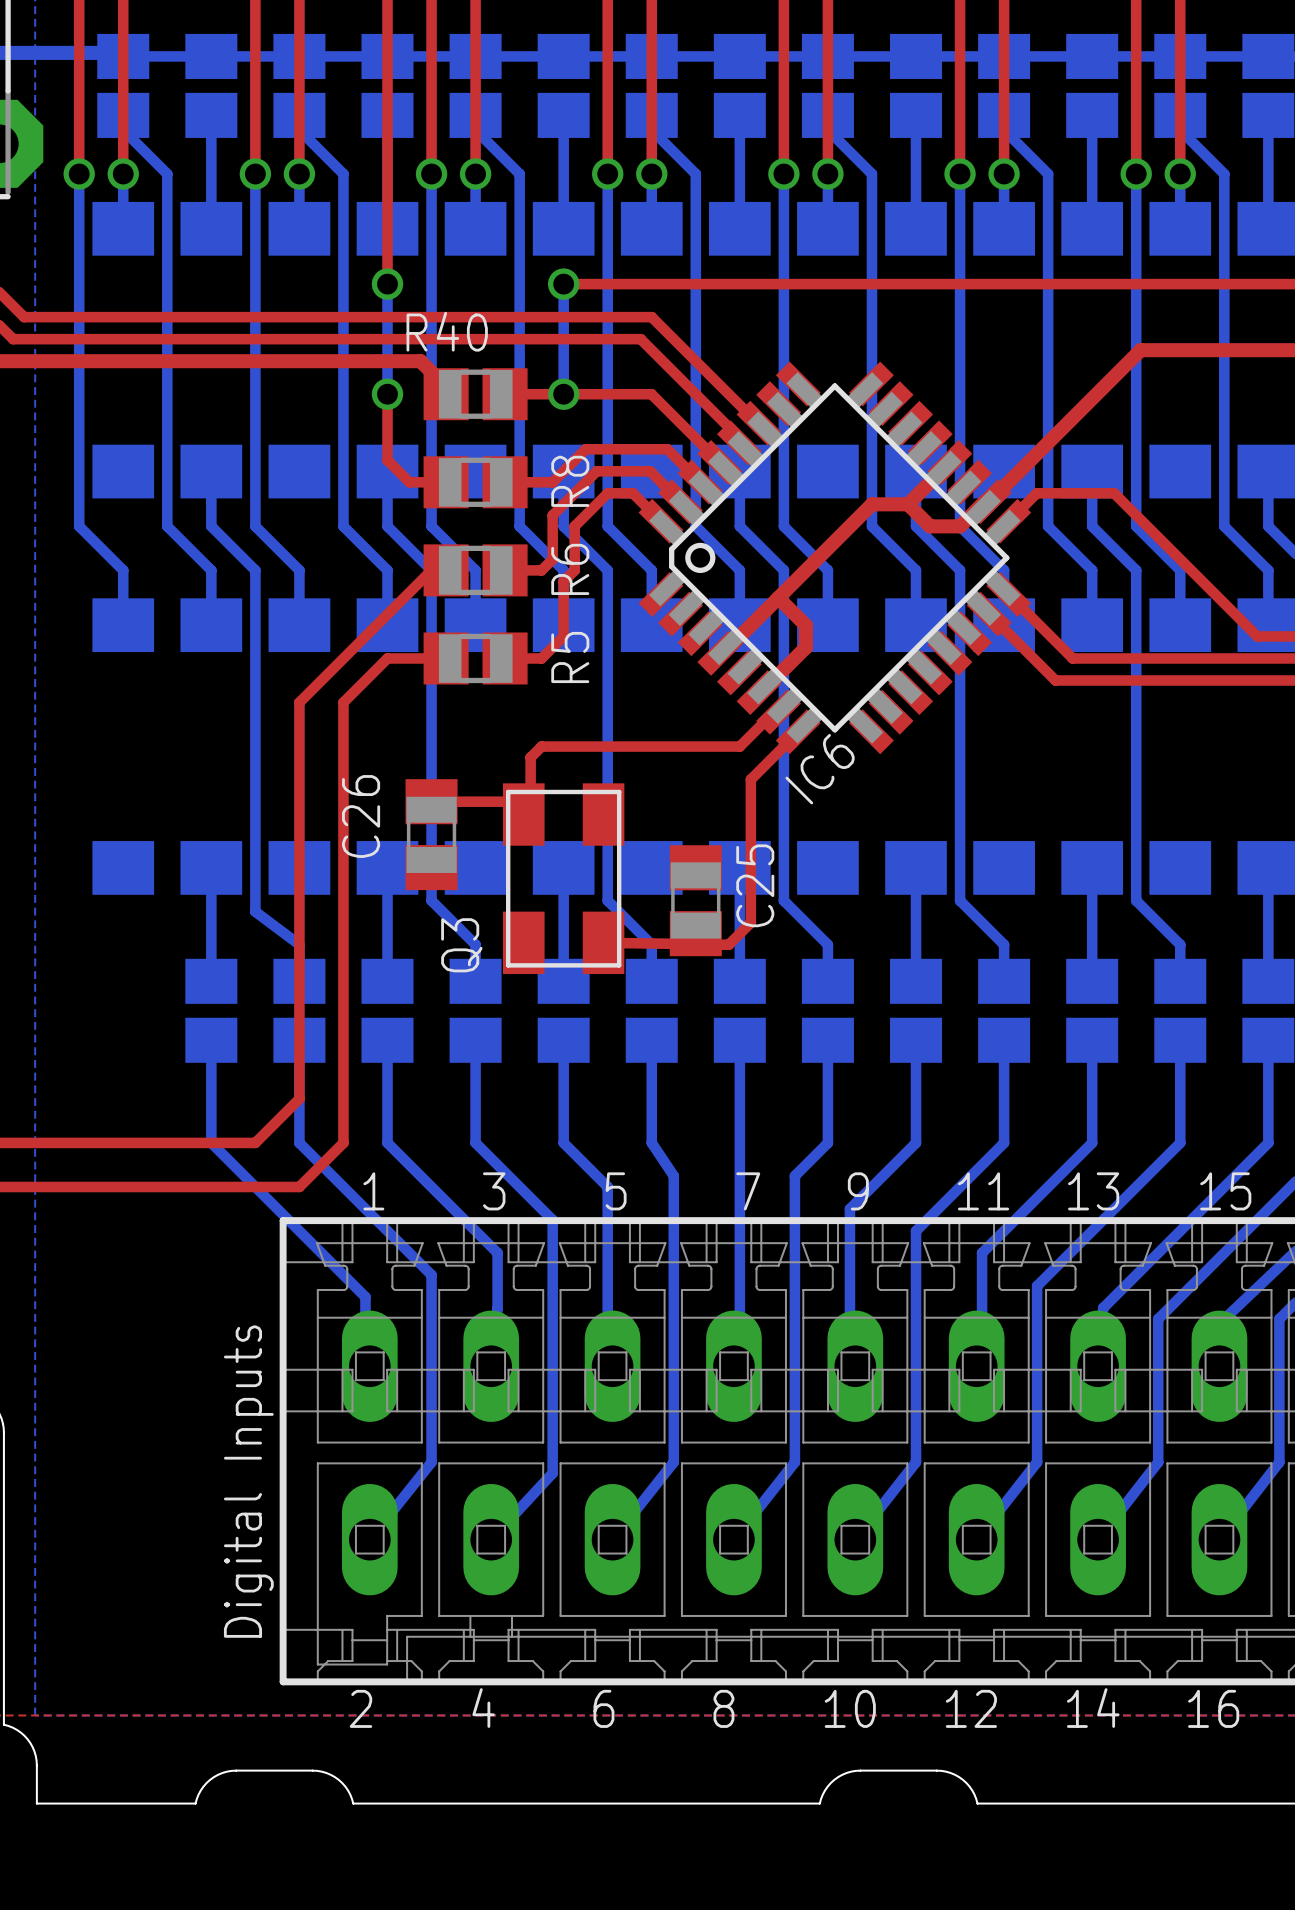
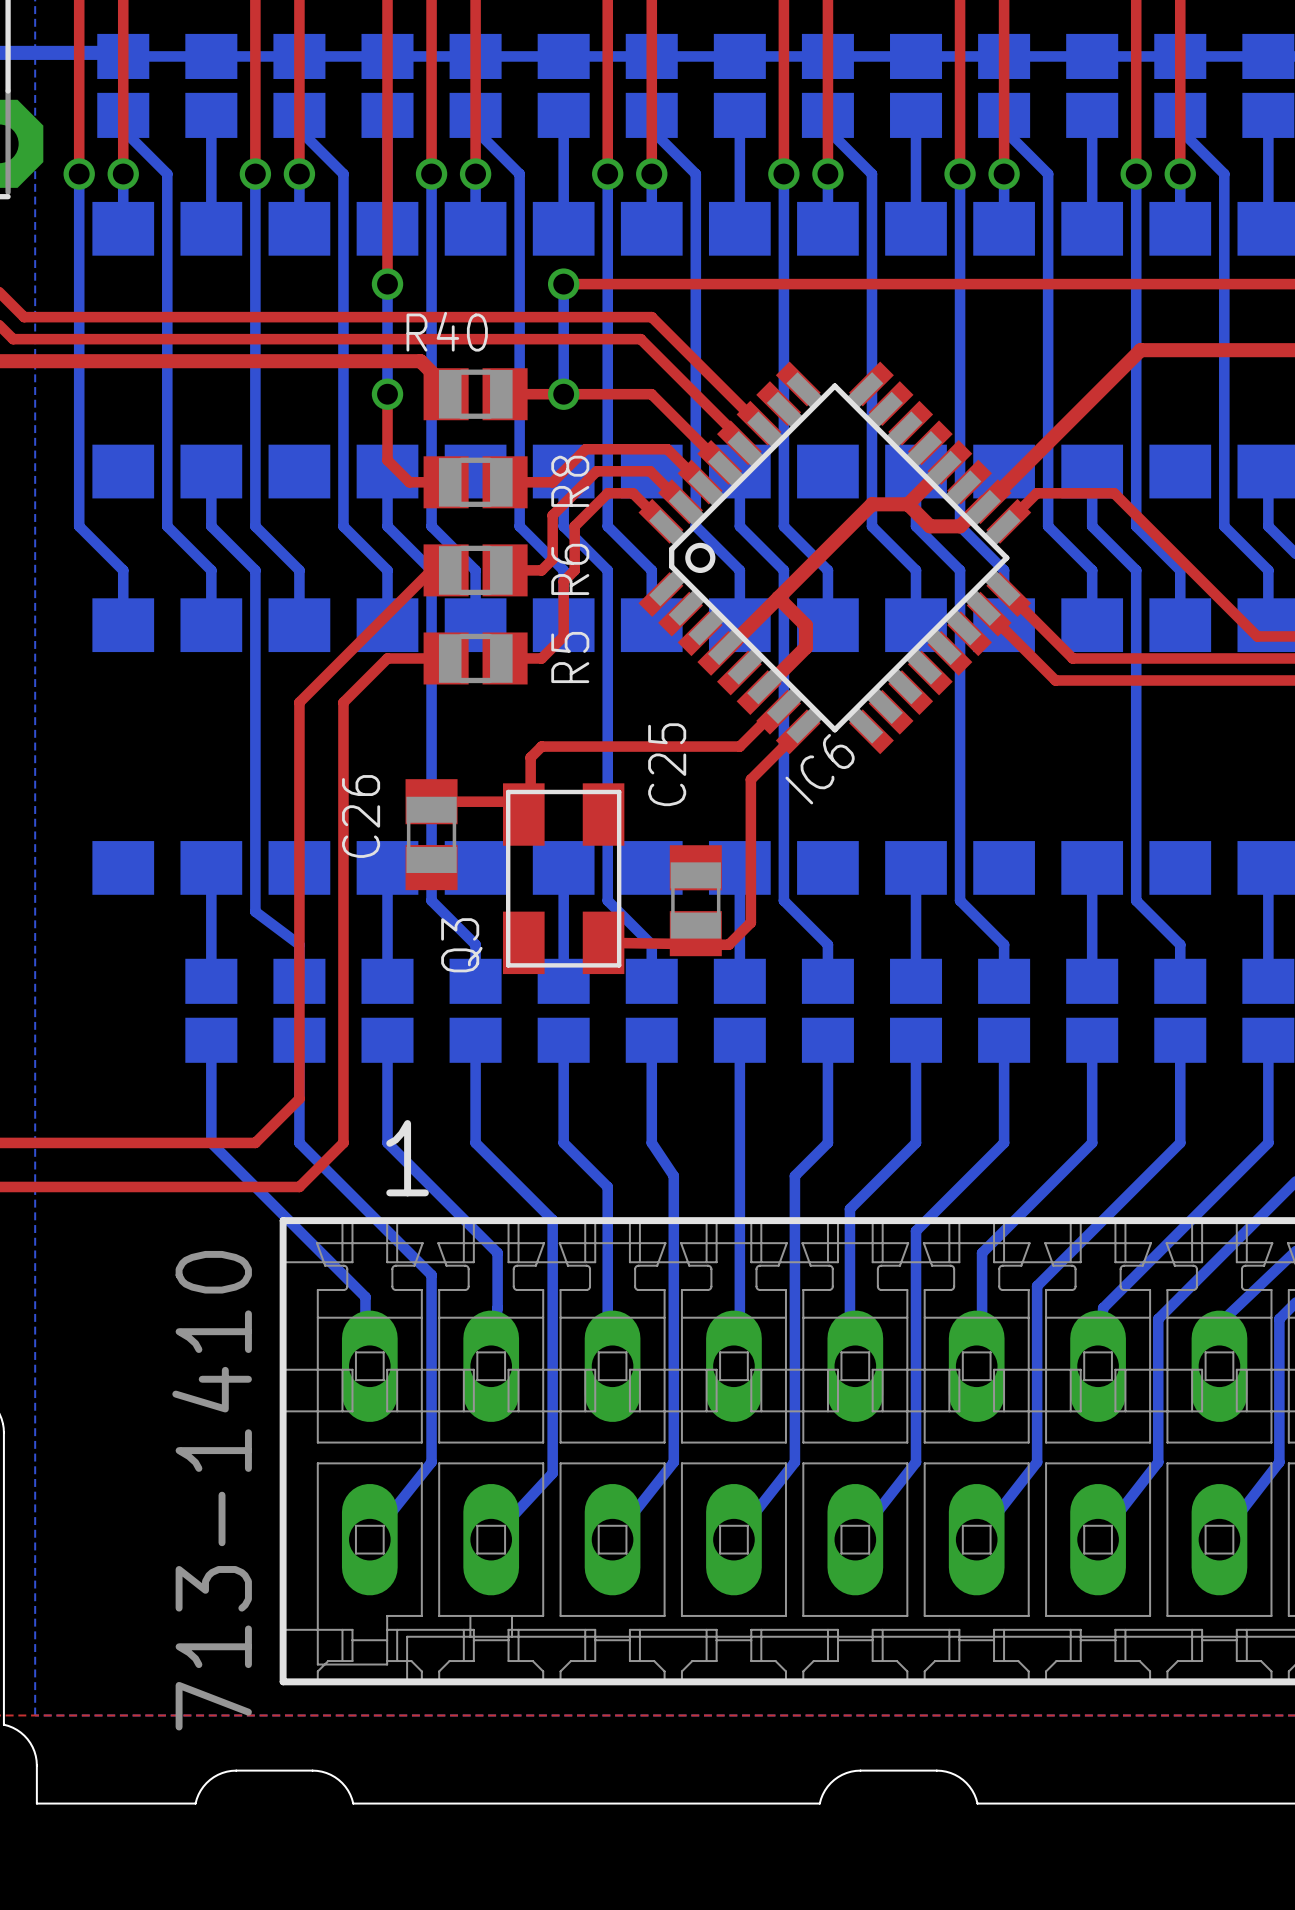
C25 name position: C25 (755, 885) -> C25 (667, 764)
part text: none -> 1 (407, 1158)
text: 1 (373, 1191) -> none
text: 3 (494, 1191) -> none
text: 5 (616, 1191) -> none
text: 7 (748, 1191) -> none
text: 9 (858, 1191) -> none
text: 11 (983, 1191) -> none
text: 13 (1093, 1191) -> none
text: 15 (1225, 1191) -> none
text: Digital Inputs (248, 1481) -> none
part value: none -> 713-1410 (212, 1490)
text: 2 (360, 1708) -> none
text: 4 (483, 1708) -> none
text: 6 (603, 1708) -> none
text: 8 (723, 1708) -> none
text: 10 (850, 1708) -> none
text: 12 (971, 1708) -> none
text: 14 (1093, 1708) -> none
text: 16 (1213, 1708) -> none

